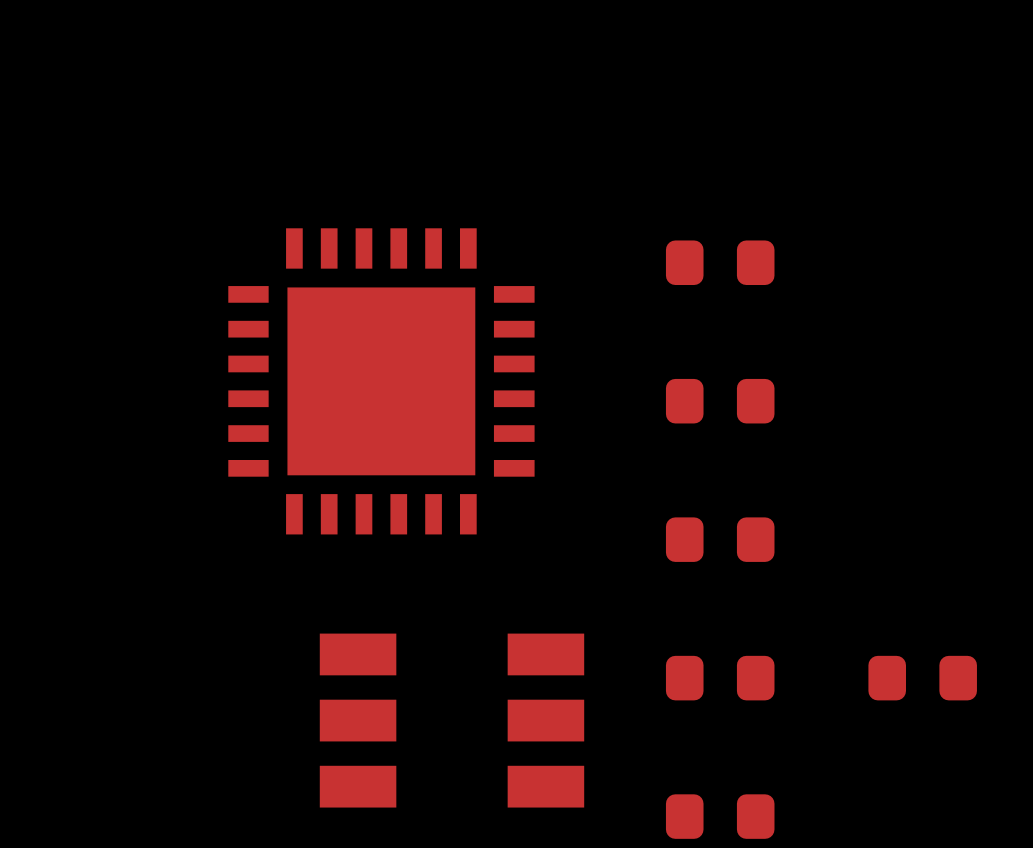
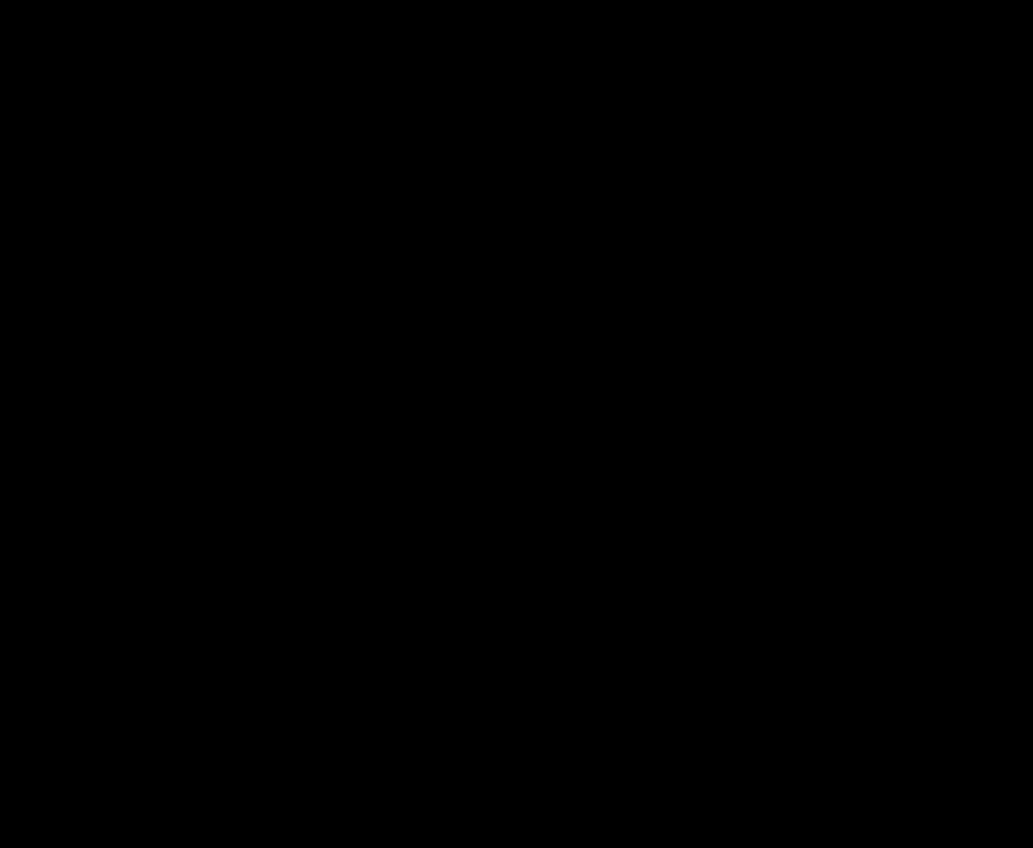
part: (720, 262) -> none
part: (381, 381) -> none
part: (720, 401) -> none
part: (720, 539) -> none
part: (720, 678) -> none
part: (922, 678) -> none
part: (451, 720) -> none
part: (720, 816) -> none

